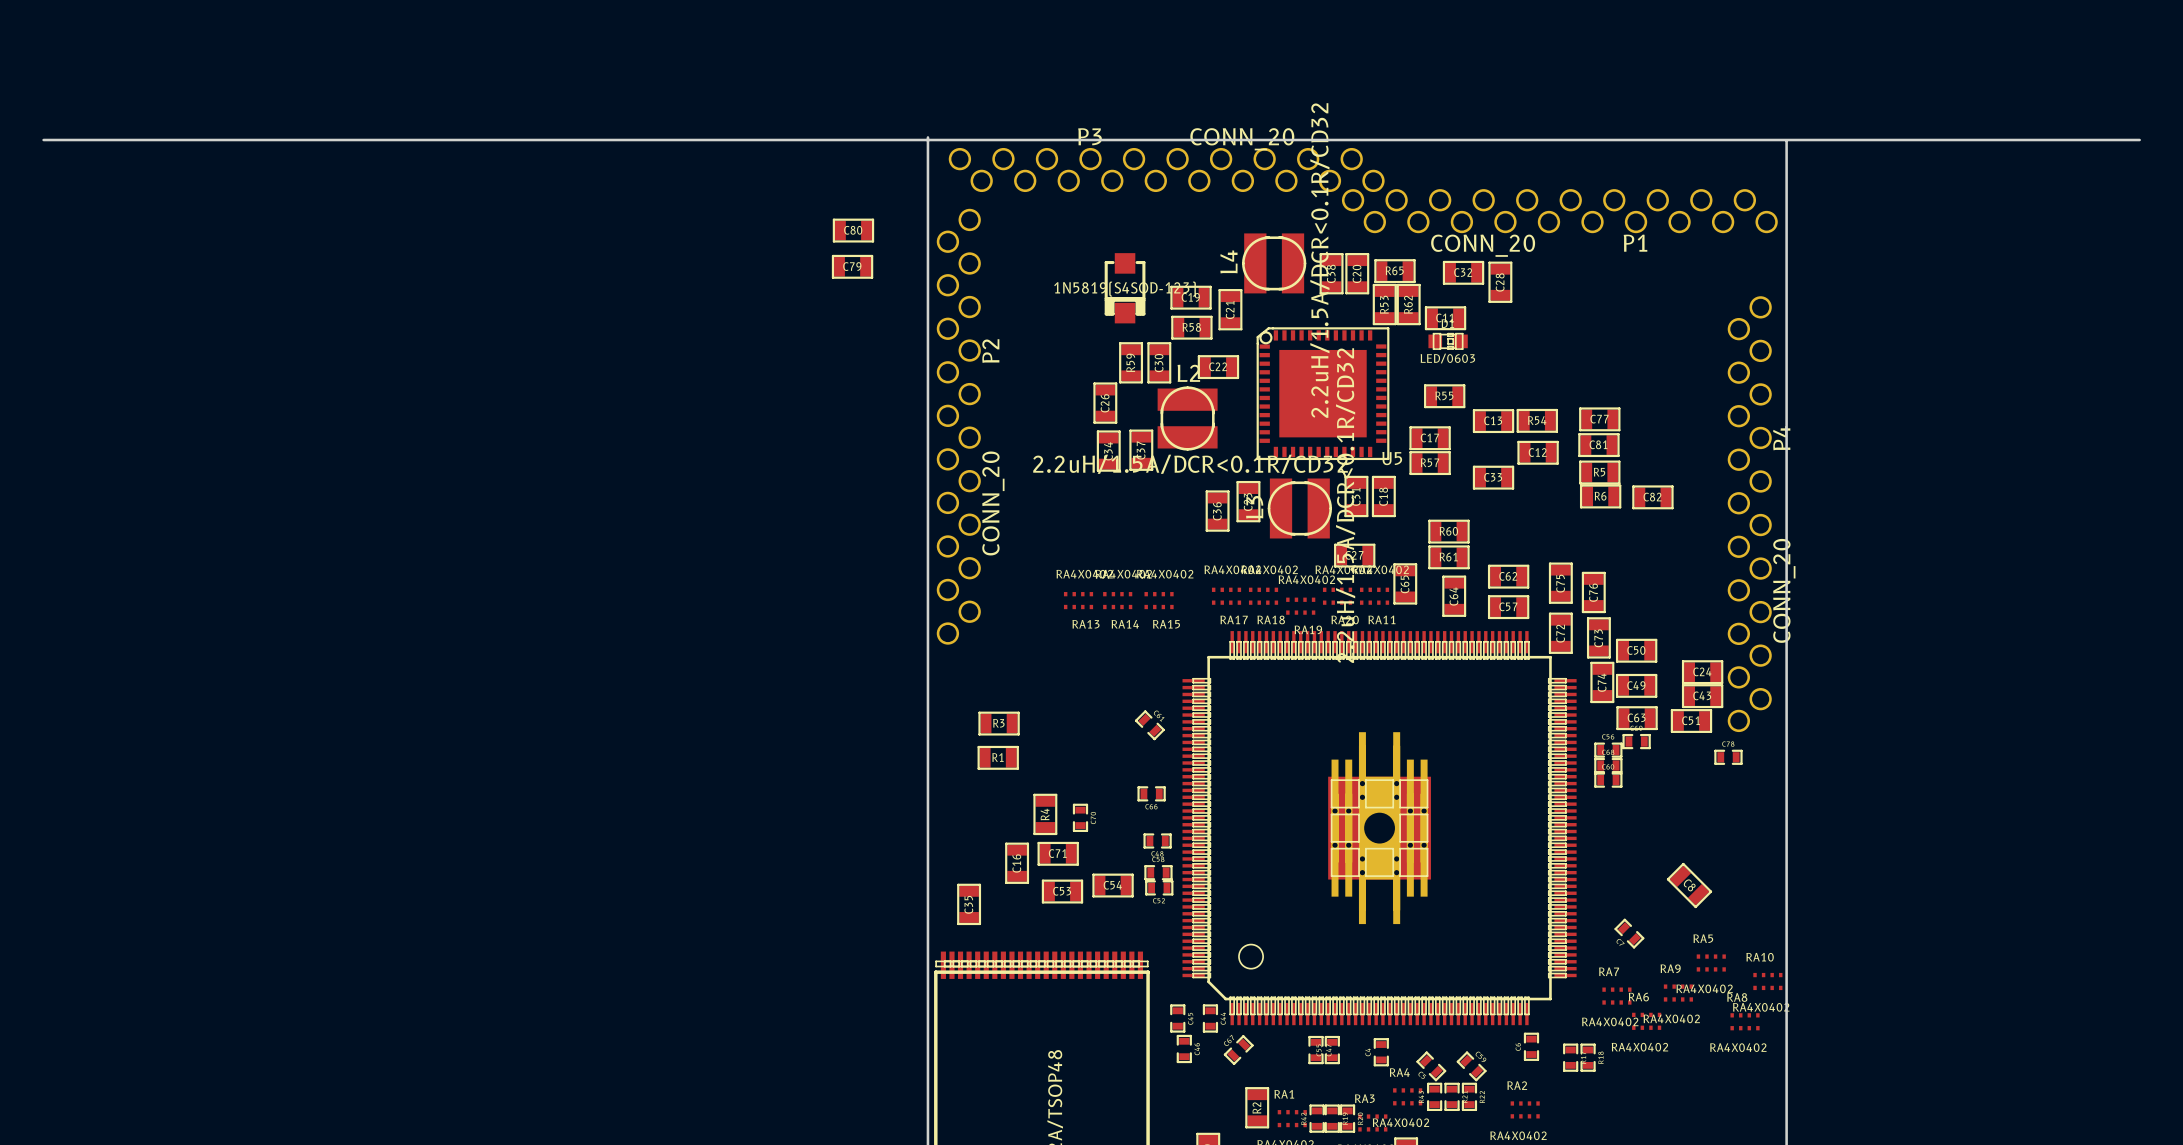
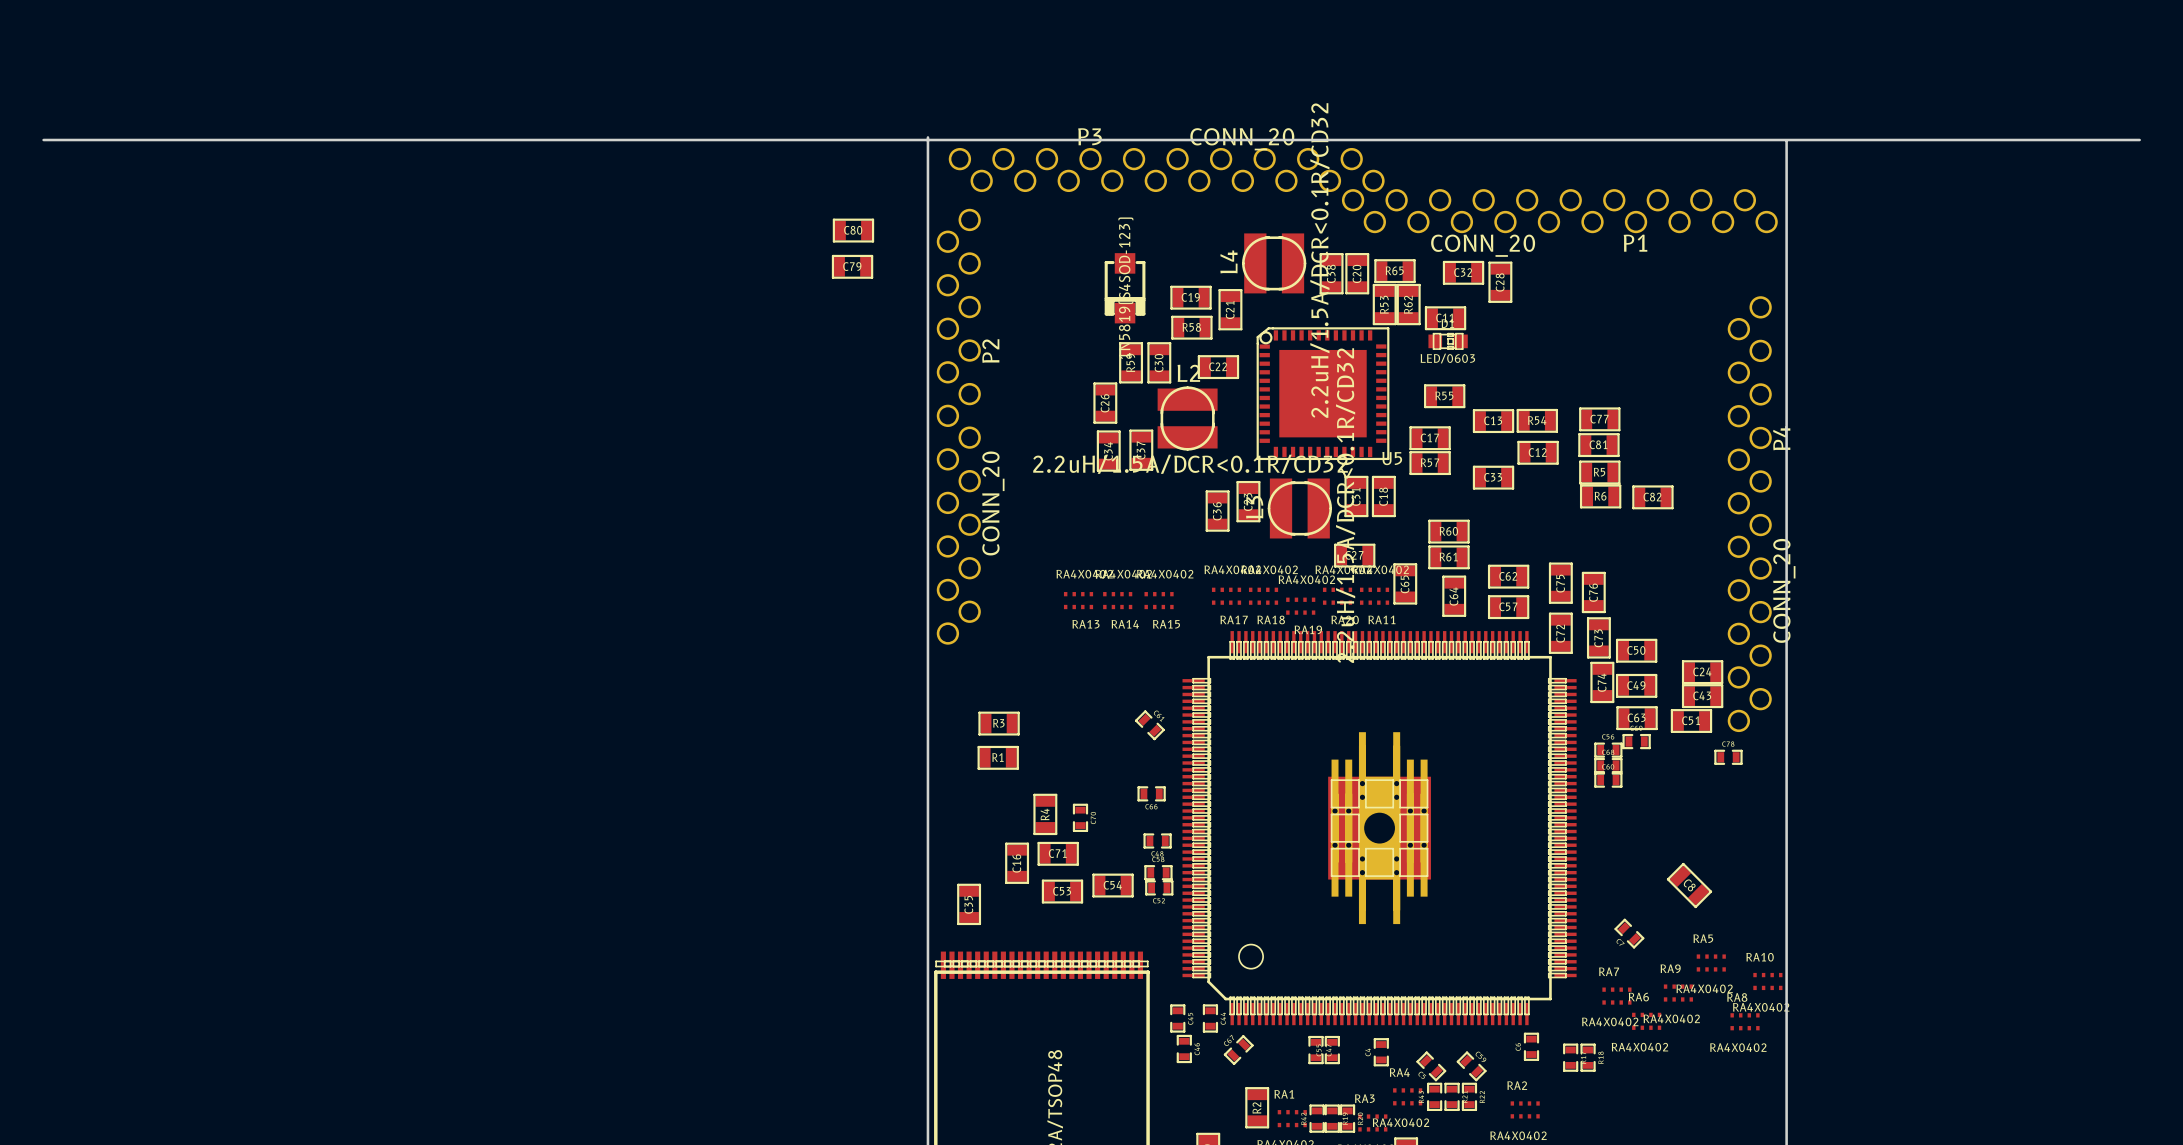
part value rotation: 0° (1125, 289) -> 90° counterclockwise (1125, 288)

